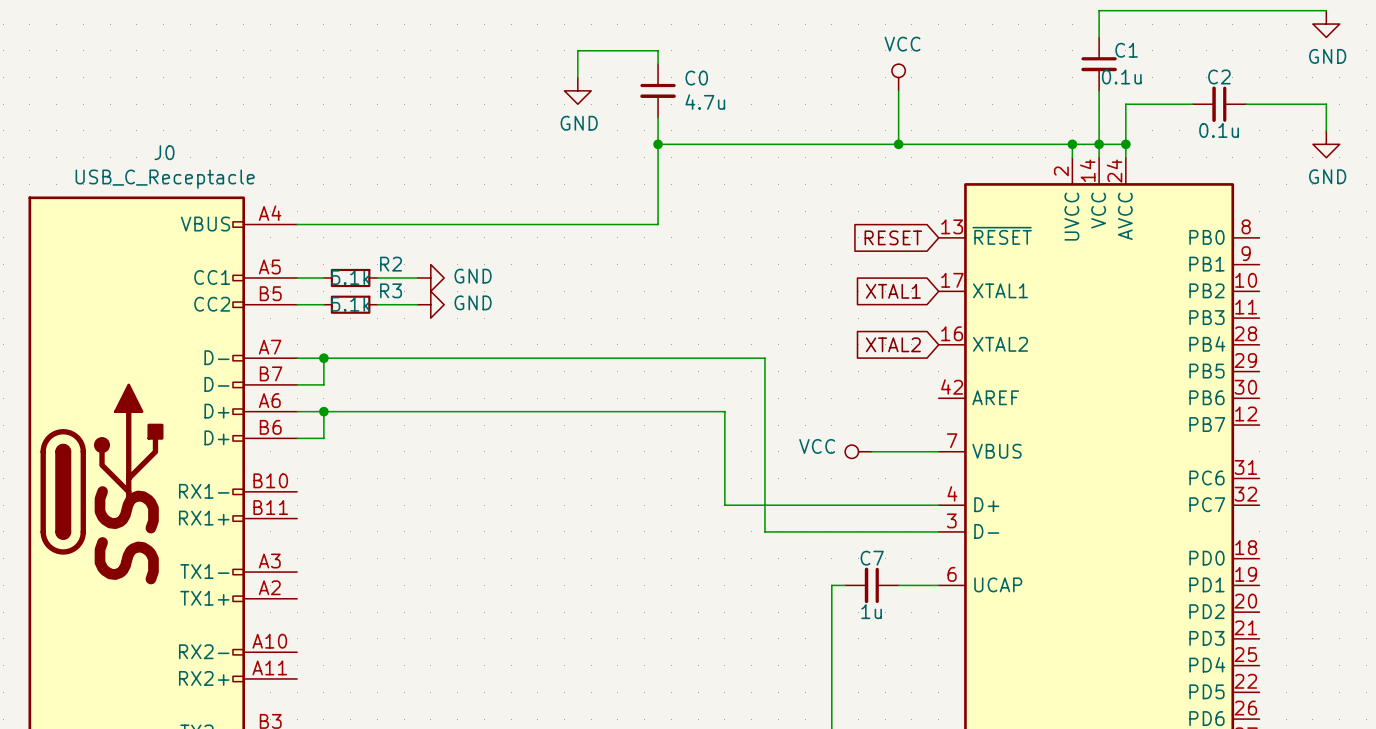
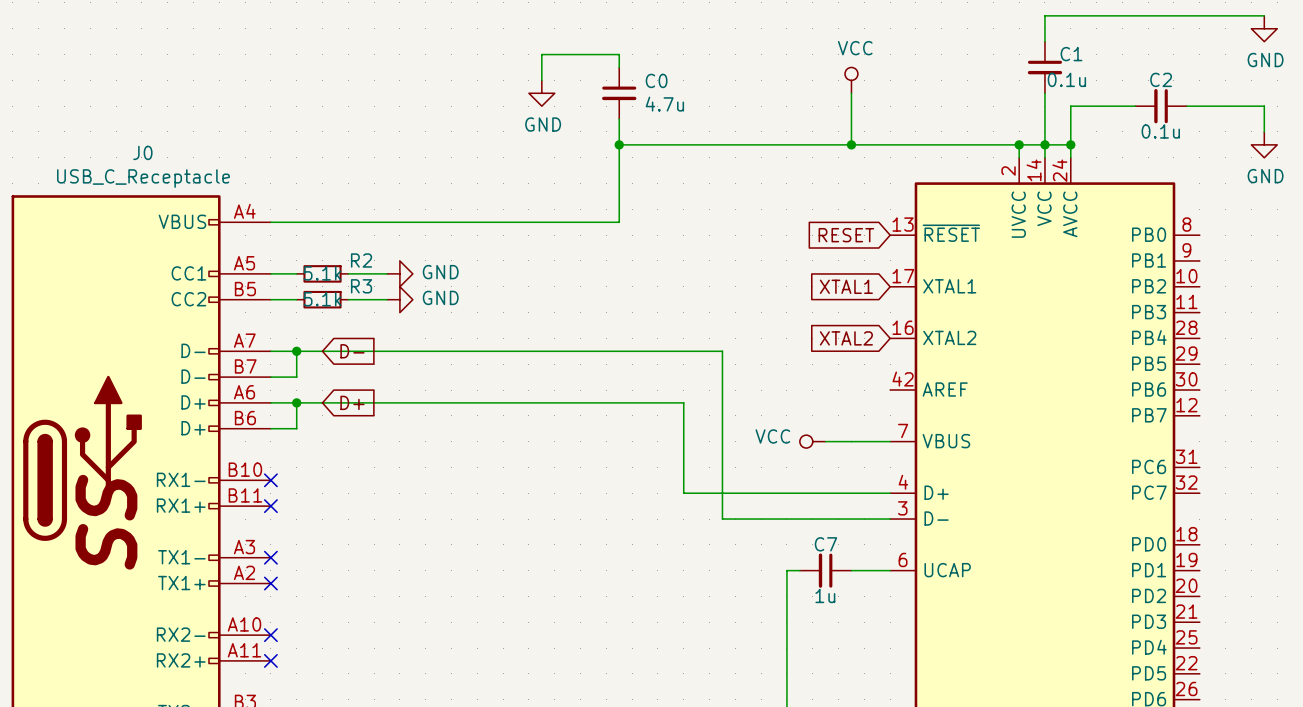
global label: none -> D- (352, 351)
global label: none -> D+ (352, 402)
no-connect mark: none -> (270, 480)
no-connect mark: none -> (270, 506)
no-connect mark: none -> (270, 557)
no-connect mark: none -> (270, 583)
no-connect mark: none -> (270, 635)
no-connect mark: none -> (270, 660)

